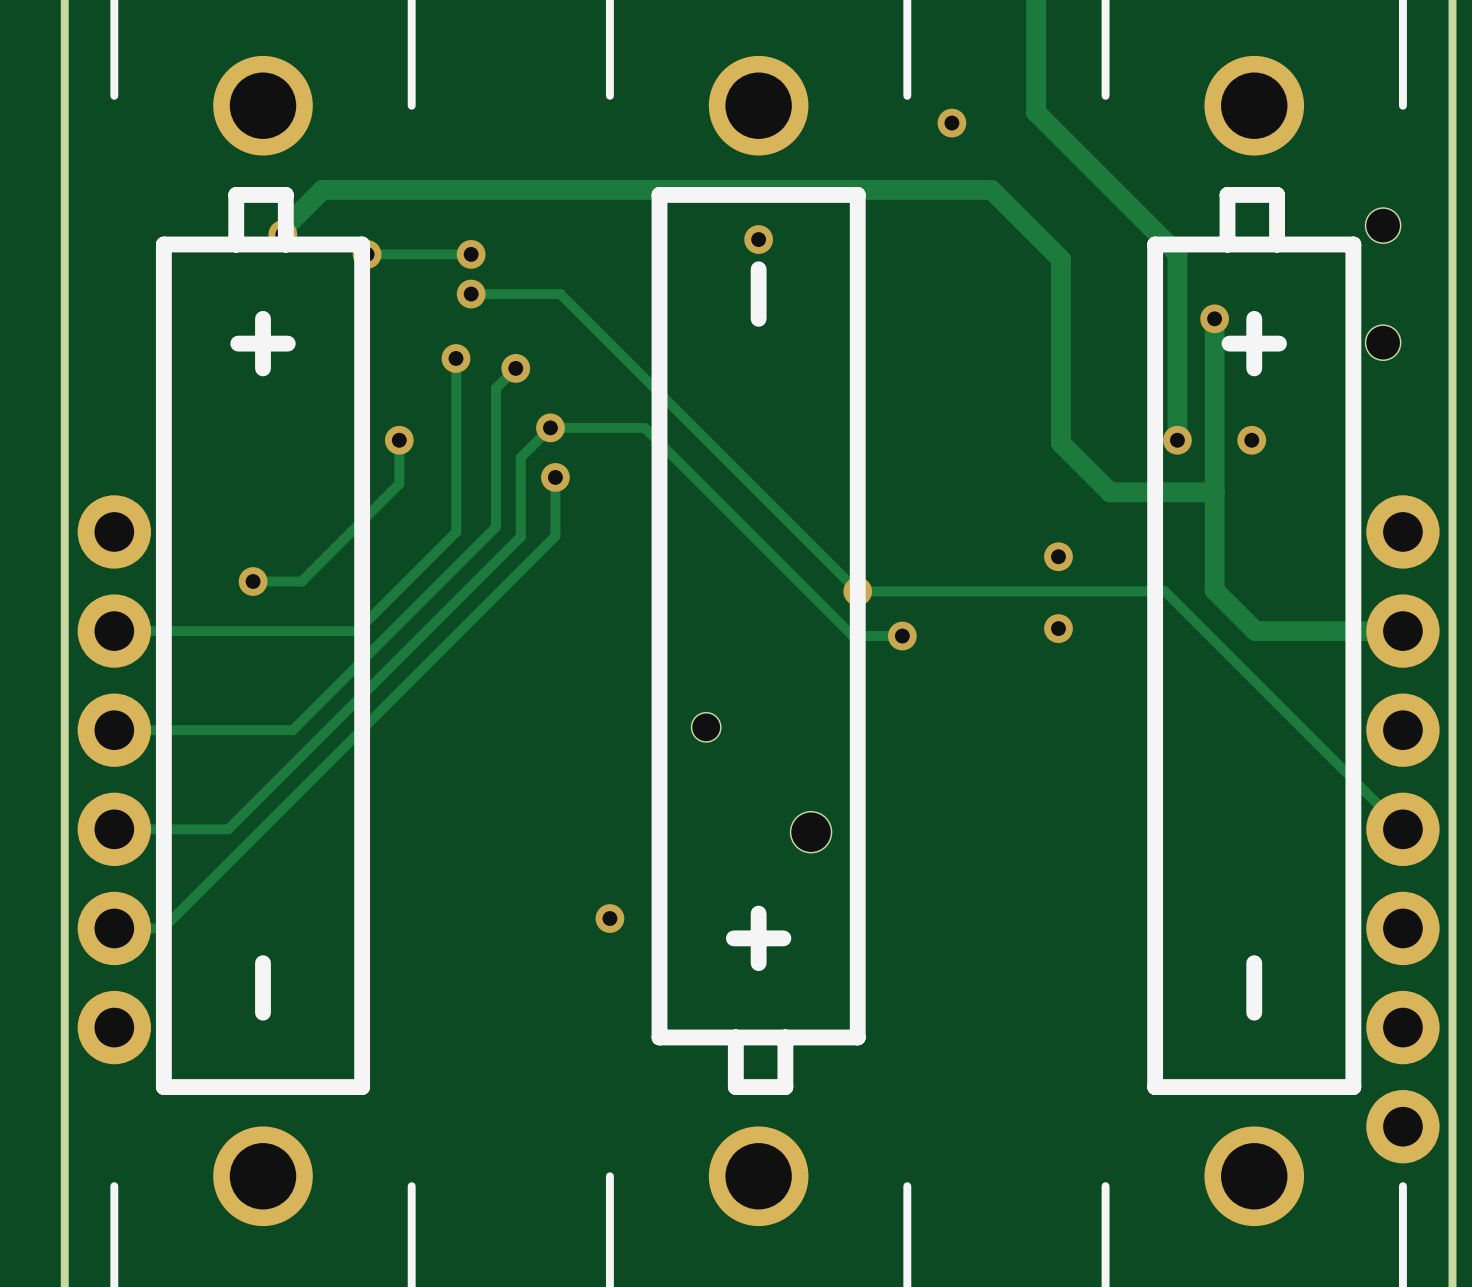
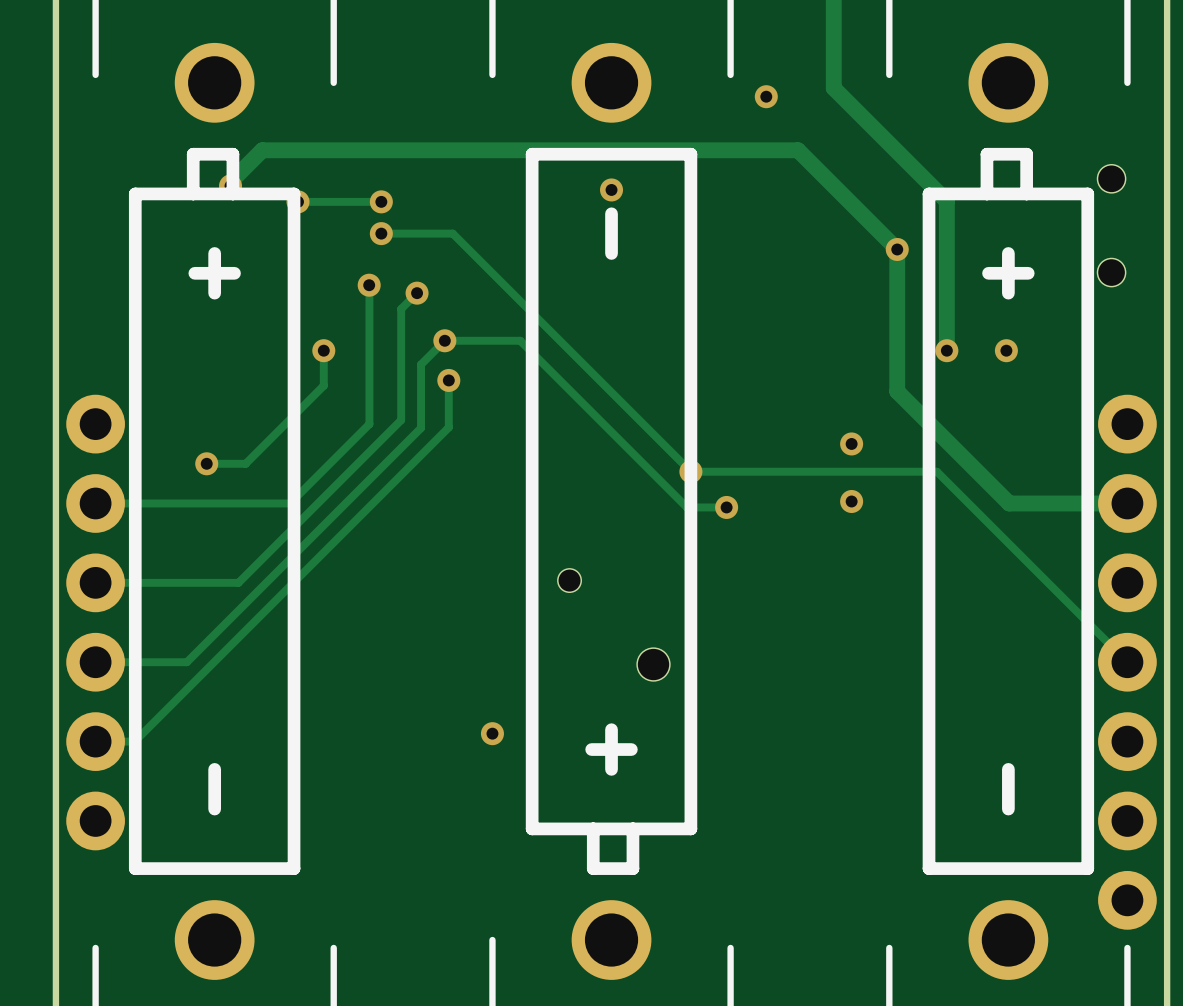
track: (1060, 259) (1060, 443) (1110, 492) (1214, 492) -> (853, 205) (897, 249) (897, 391) (976, 470)
track: (1214, 318) (1214, 590) -> none
via position: (1214, 318) -> (897, 249)

